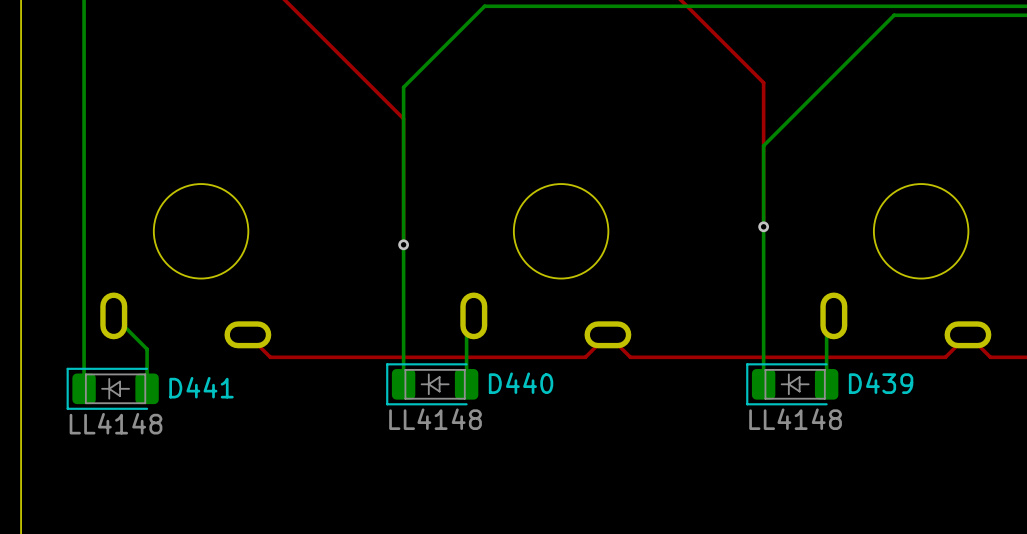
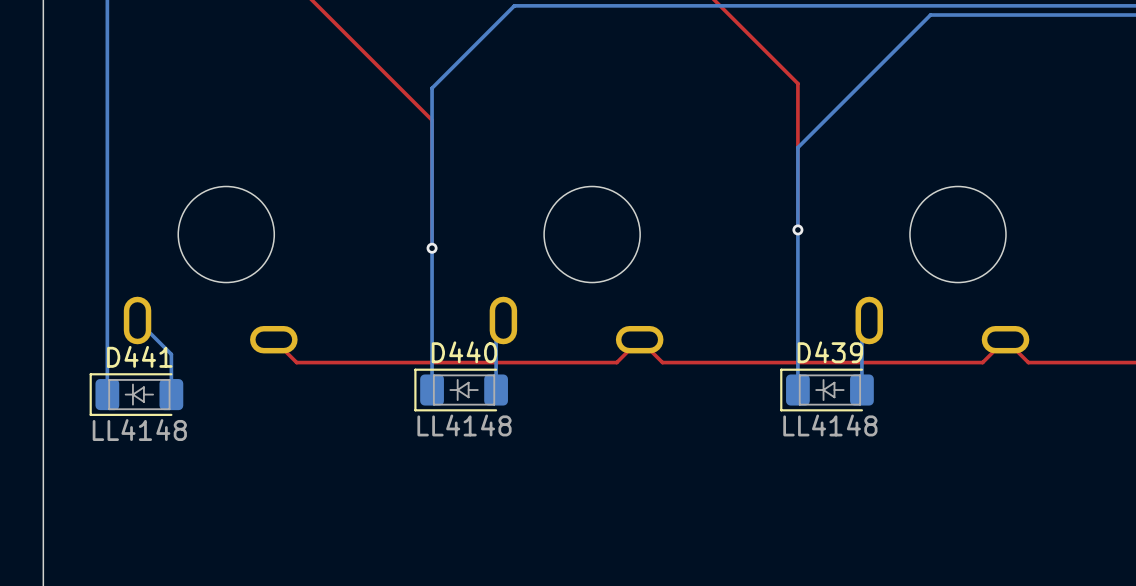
D440 name position: D440 (521, 383) -> D440 (464, 352)
D439 name position: D439 (881, 383) -> D439 (830, 352)
D441 name position: D441 (201, 387) -> D441 (139, 356)

